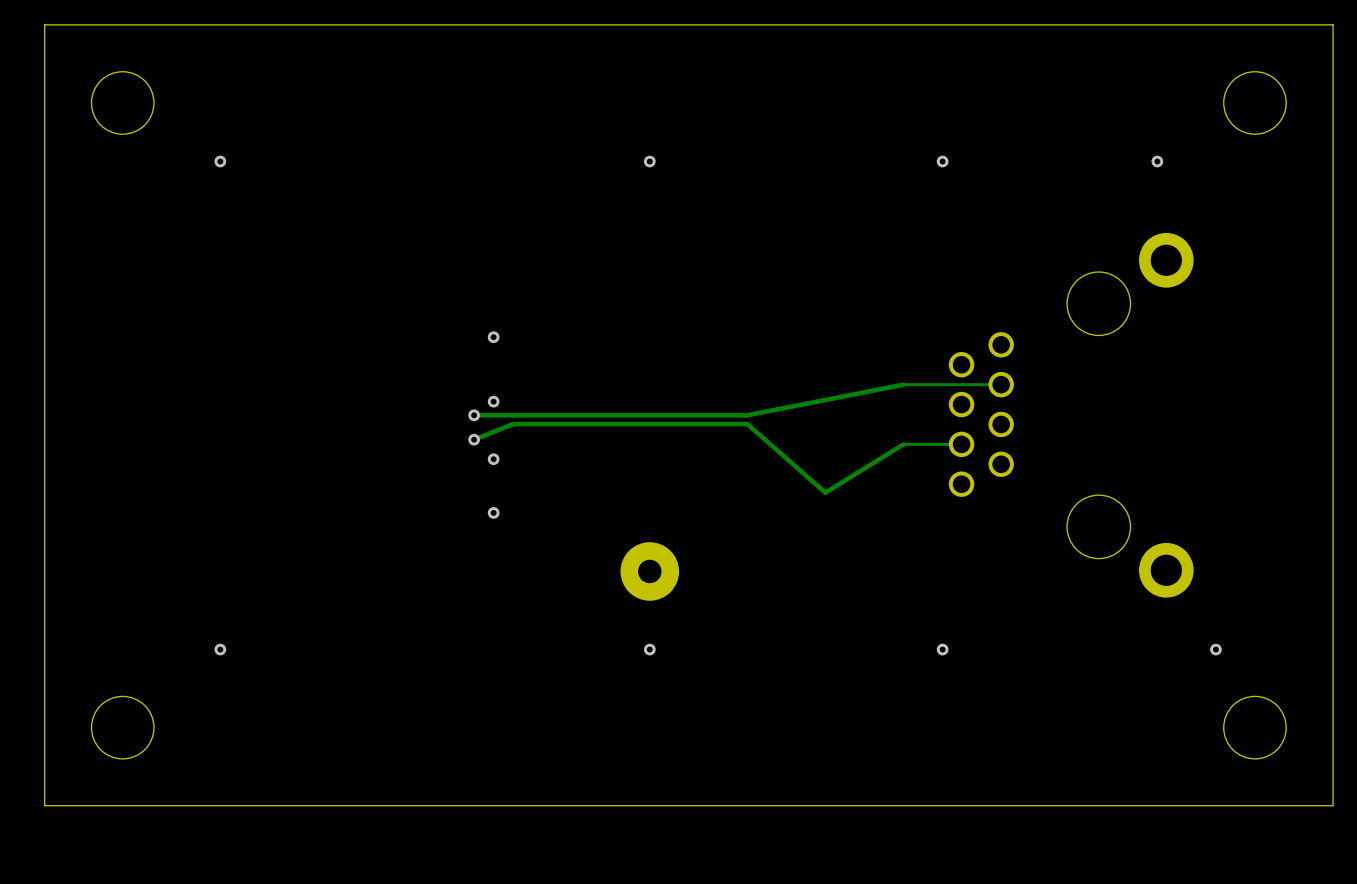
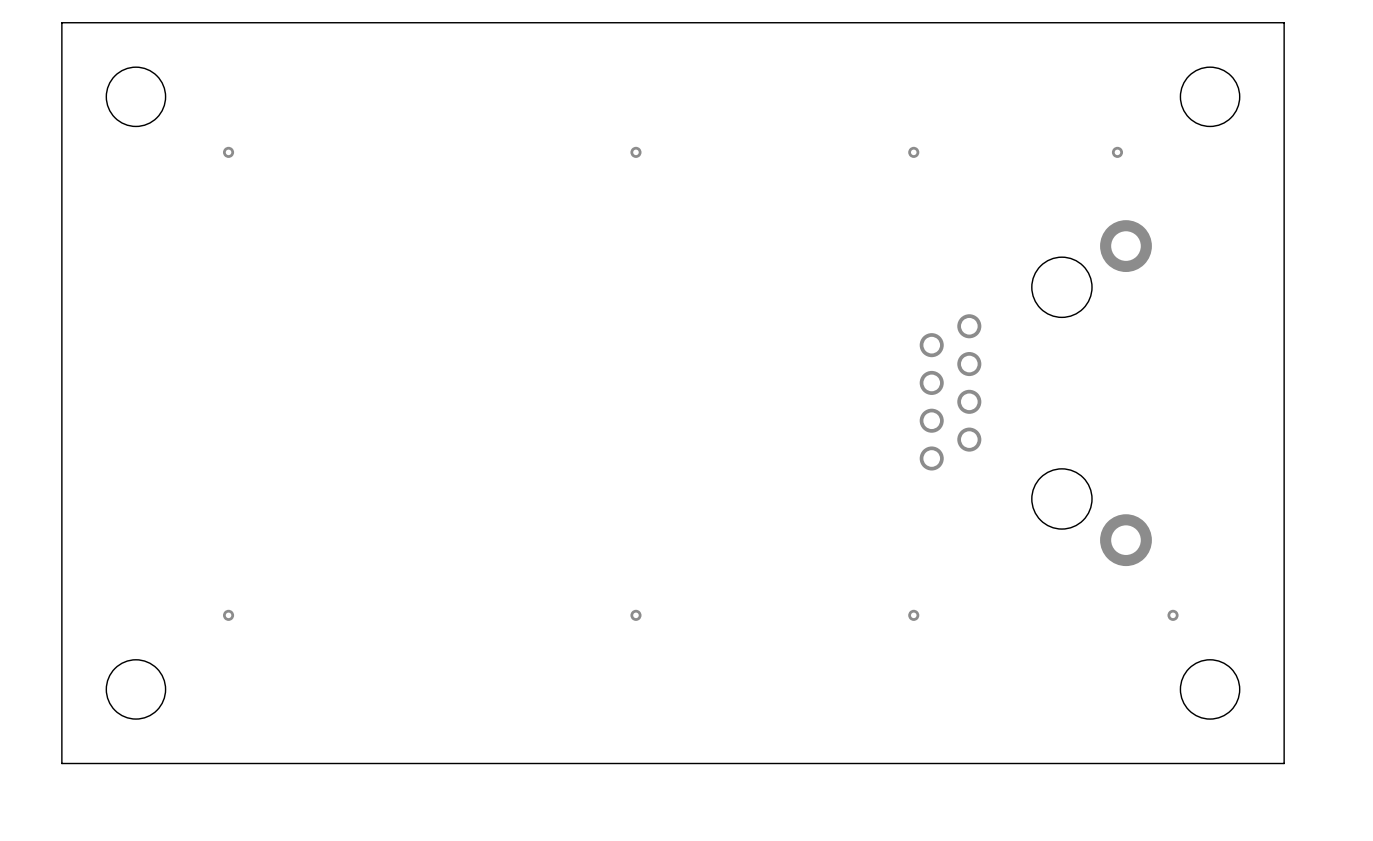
via: (493, 337) -> none
track: (1001, 384) (903, 384) (747, 415) (474, 415) -> none
via: (493, 401) -> none
via: (474, 415) -> none
track: (474, 439) (513, 424) (747, 424) (825, 492) (903, 444) (961, 444) -> none
via: (474, 439) -> none
via: (493, 459) -> none
via: (493, 512) -> none
part: (649, 571) -> none

